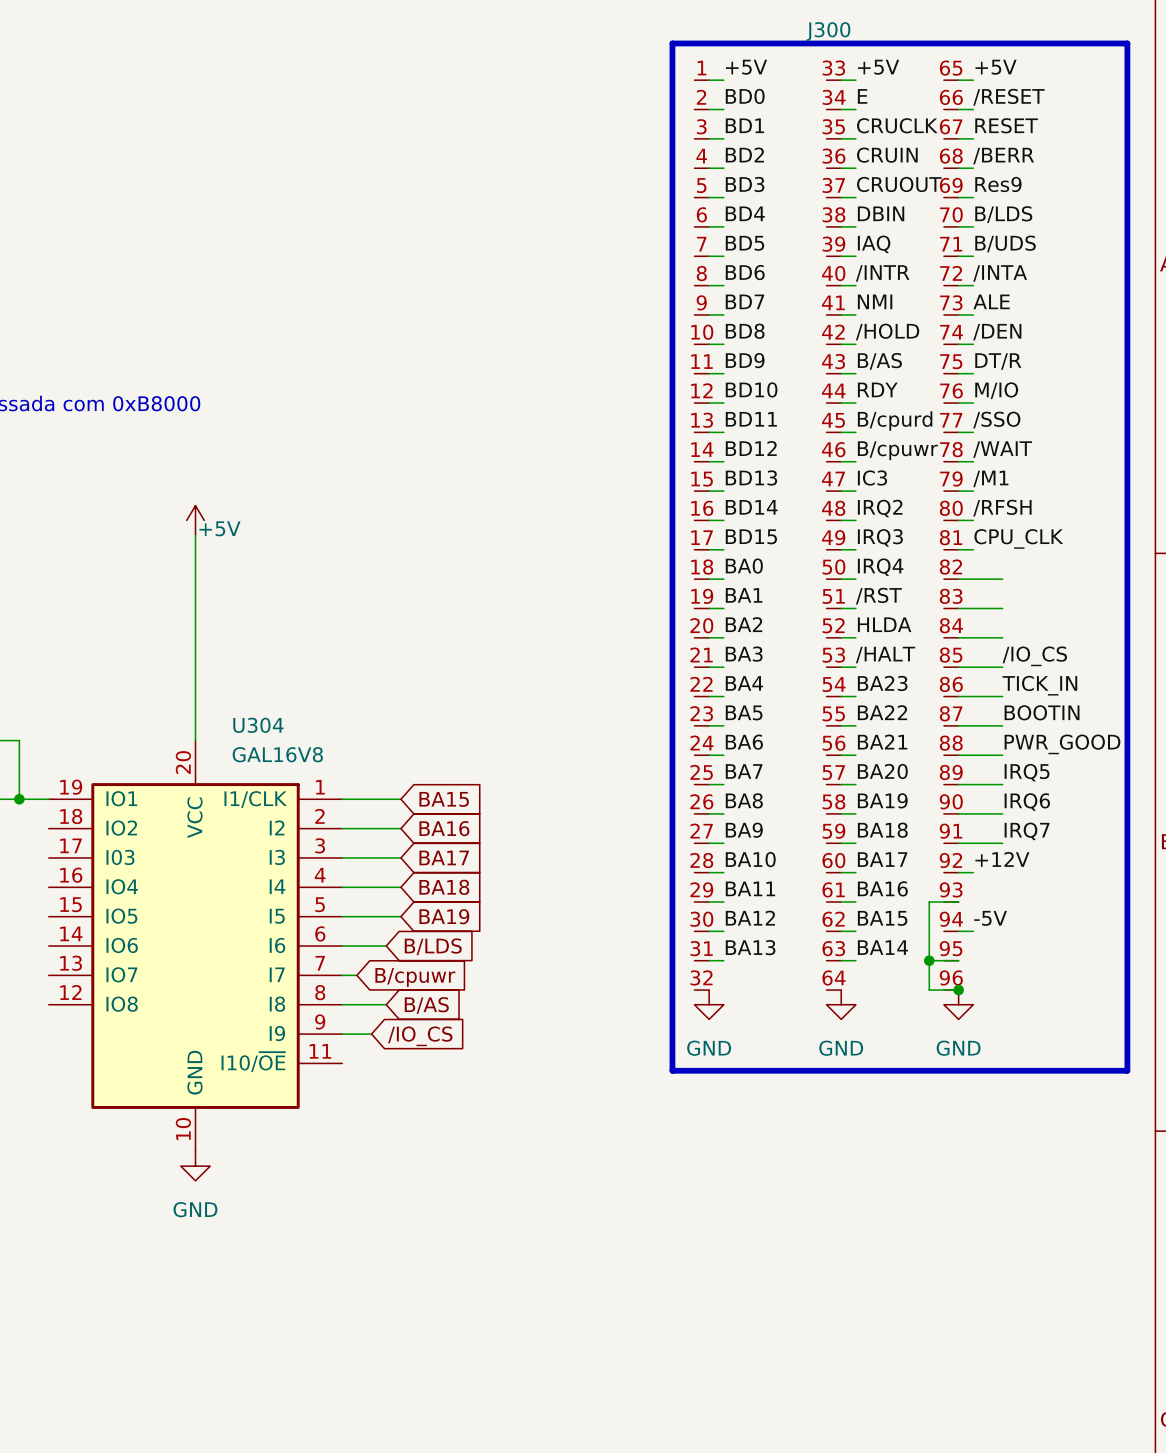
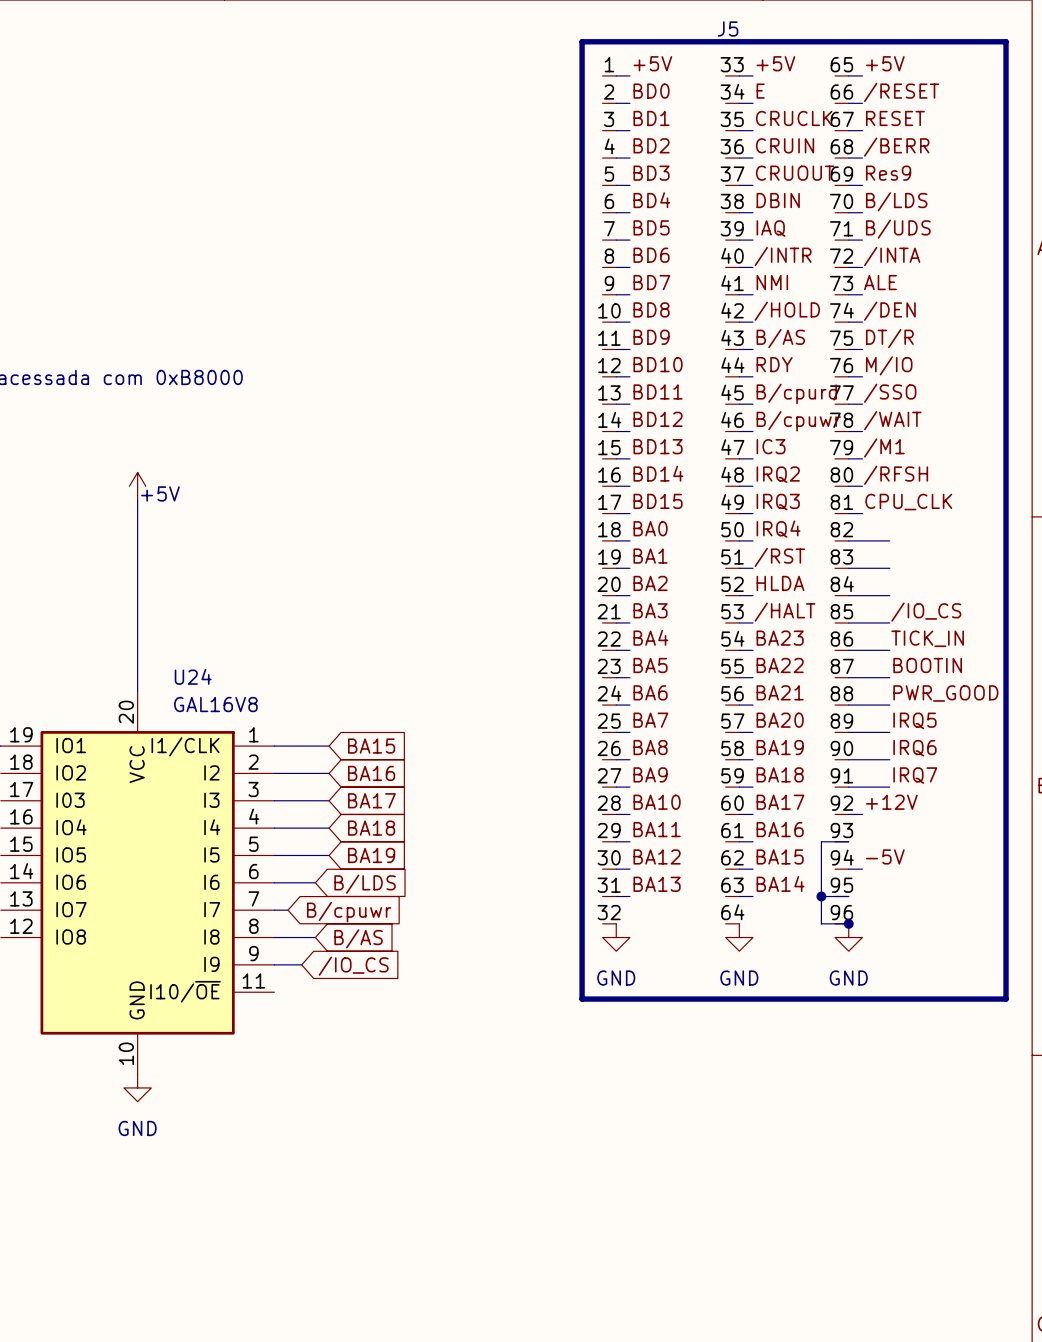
J300 name: J300 (828, 31) -> J5 (728, 28)
U304 name: U304 (258, 725) -> U24 (193, 676)

